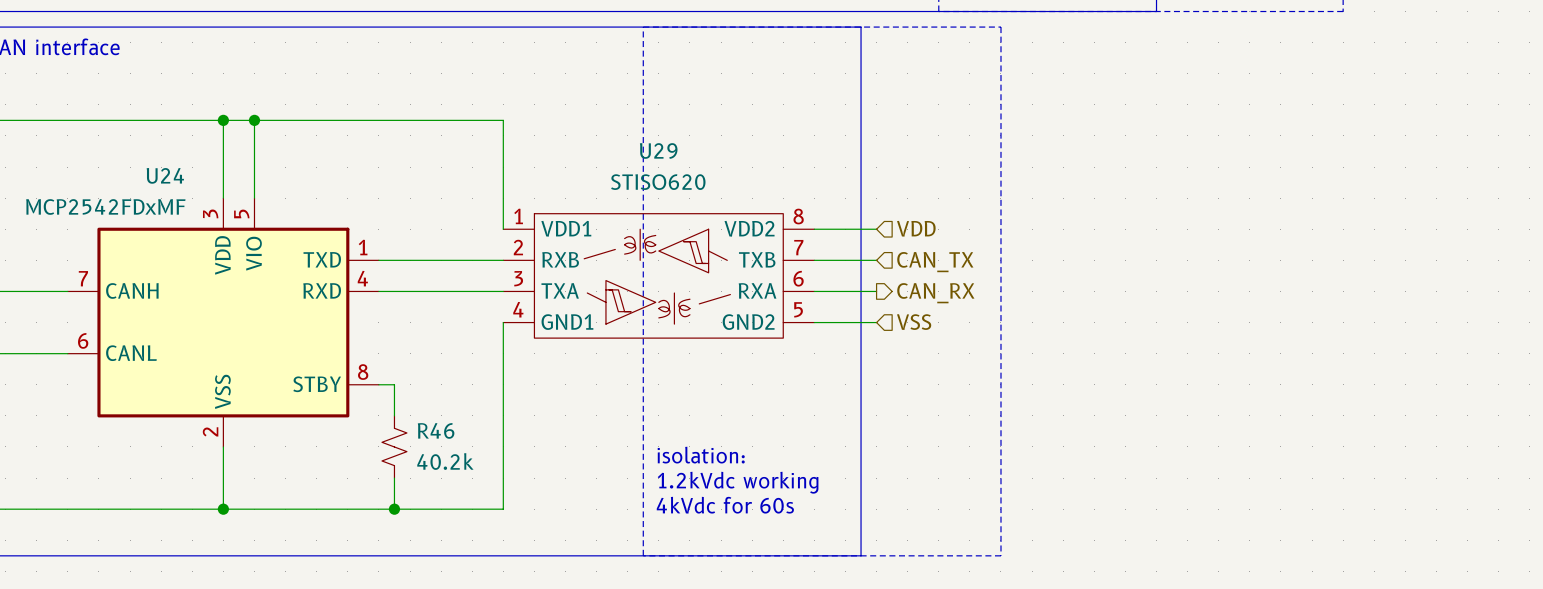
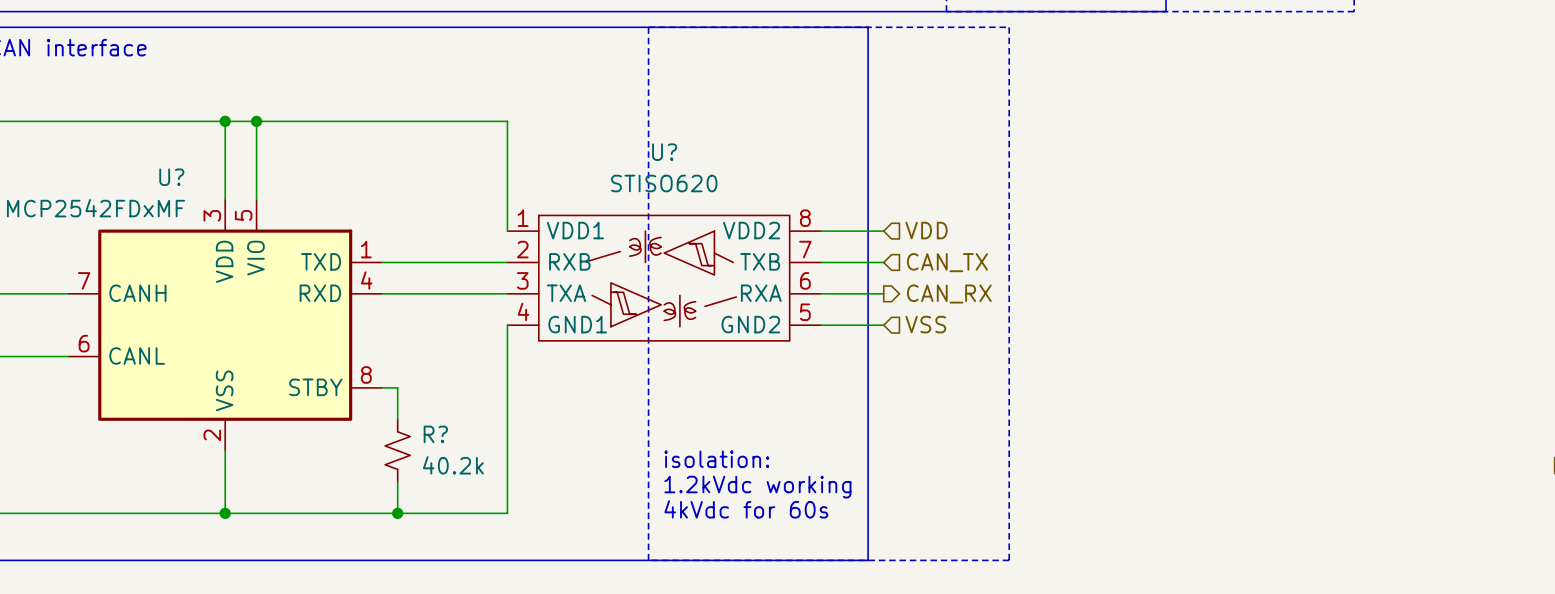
U29 name: U29 (658, 150) -> U? (664, 152)
U24 name: U24 (165, 175) -> U? (171, 177)
R46 name: R46 (436, 430) -> R? (435, 434)

